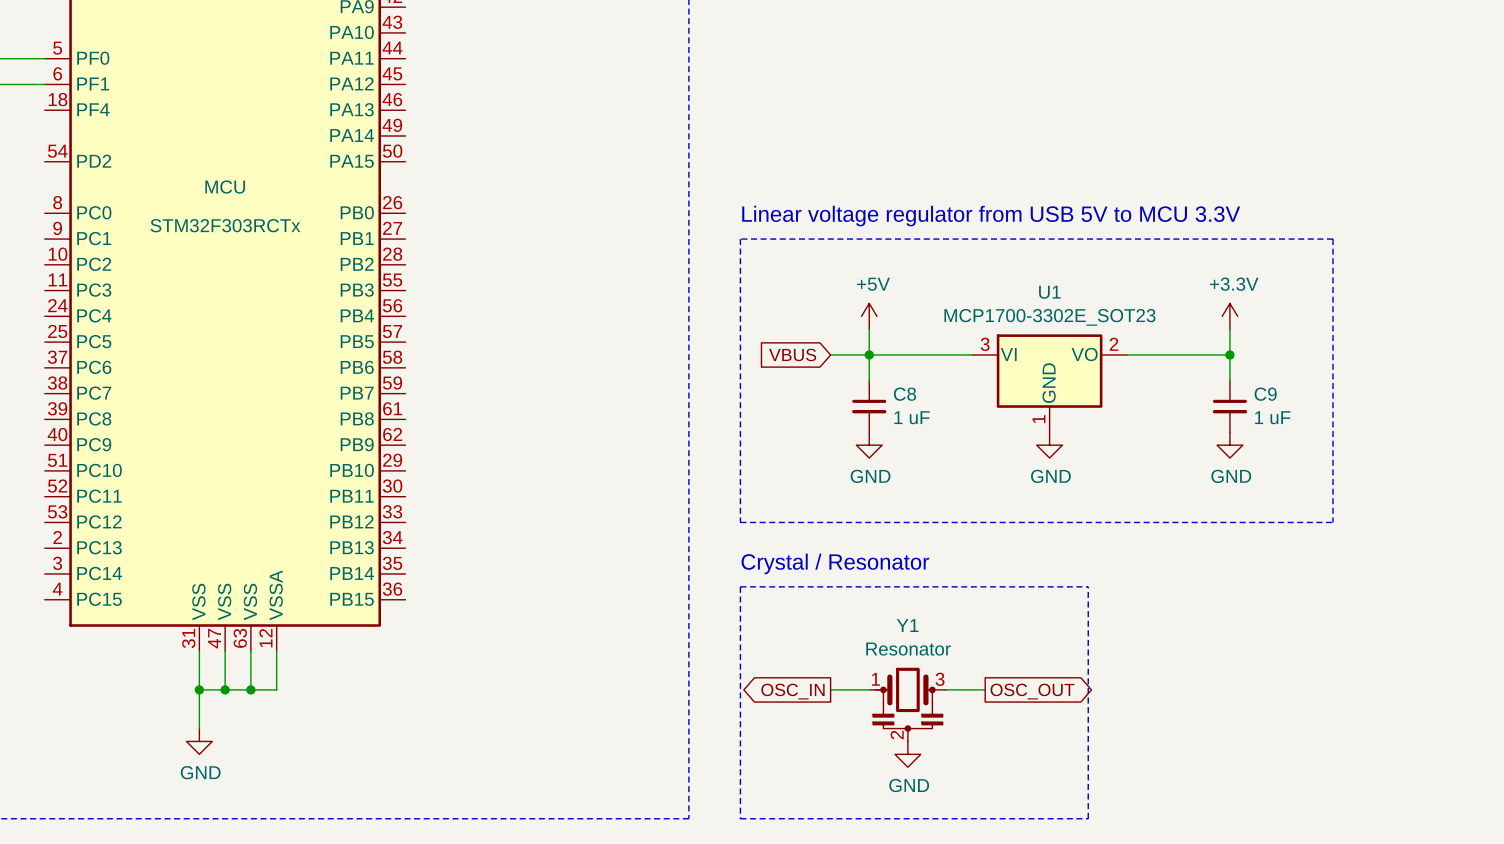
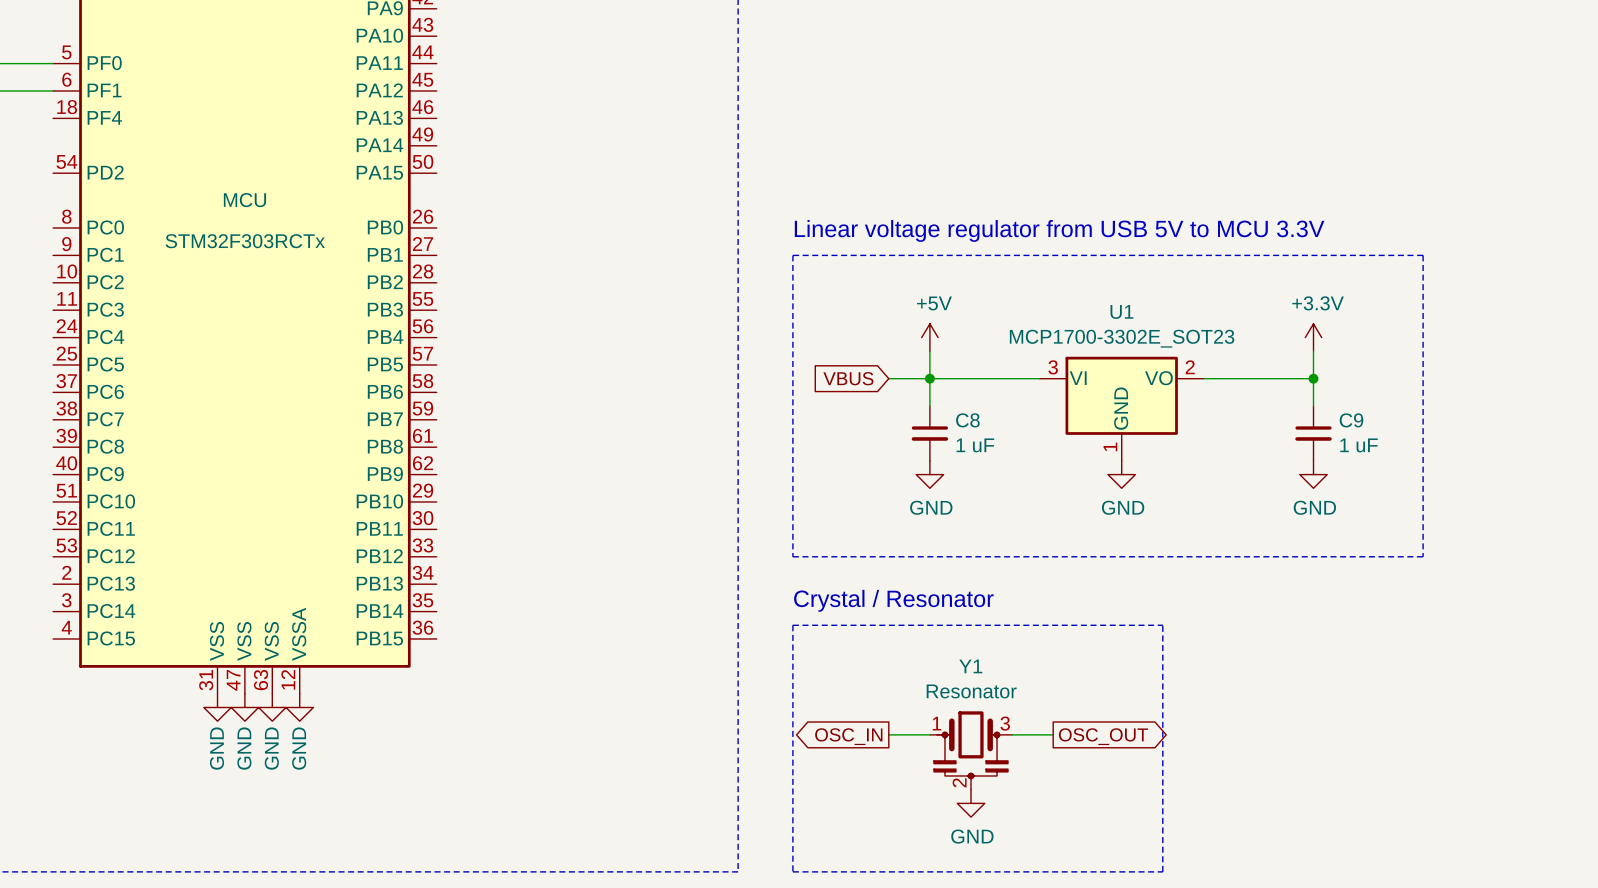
wire: (199, 651) (199, 728) -> none
wire: (225, 651) (225, 689) -> none
wire: (250, 651) (250, 689) -> none
wire: (276, 651) (276, 689) (199, 689) -> none
power symbol: none -> GND (217, 707)
power symbol: none -> GND (244, 707)
power symbol: none -> GND (272, 707)
power symbol: none -> GND (299, 707)
junction: (199, 689) -> none
junction: (225, 689) -> none
junction: (250, 689) -> none
power symbol: GND (199, 741) -> none

